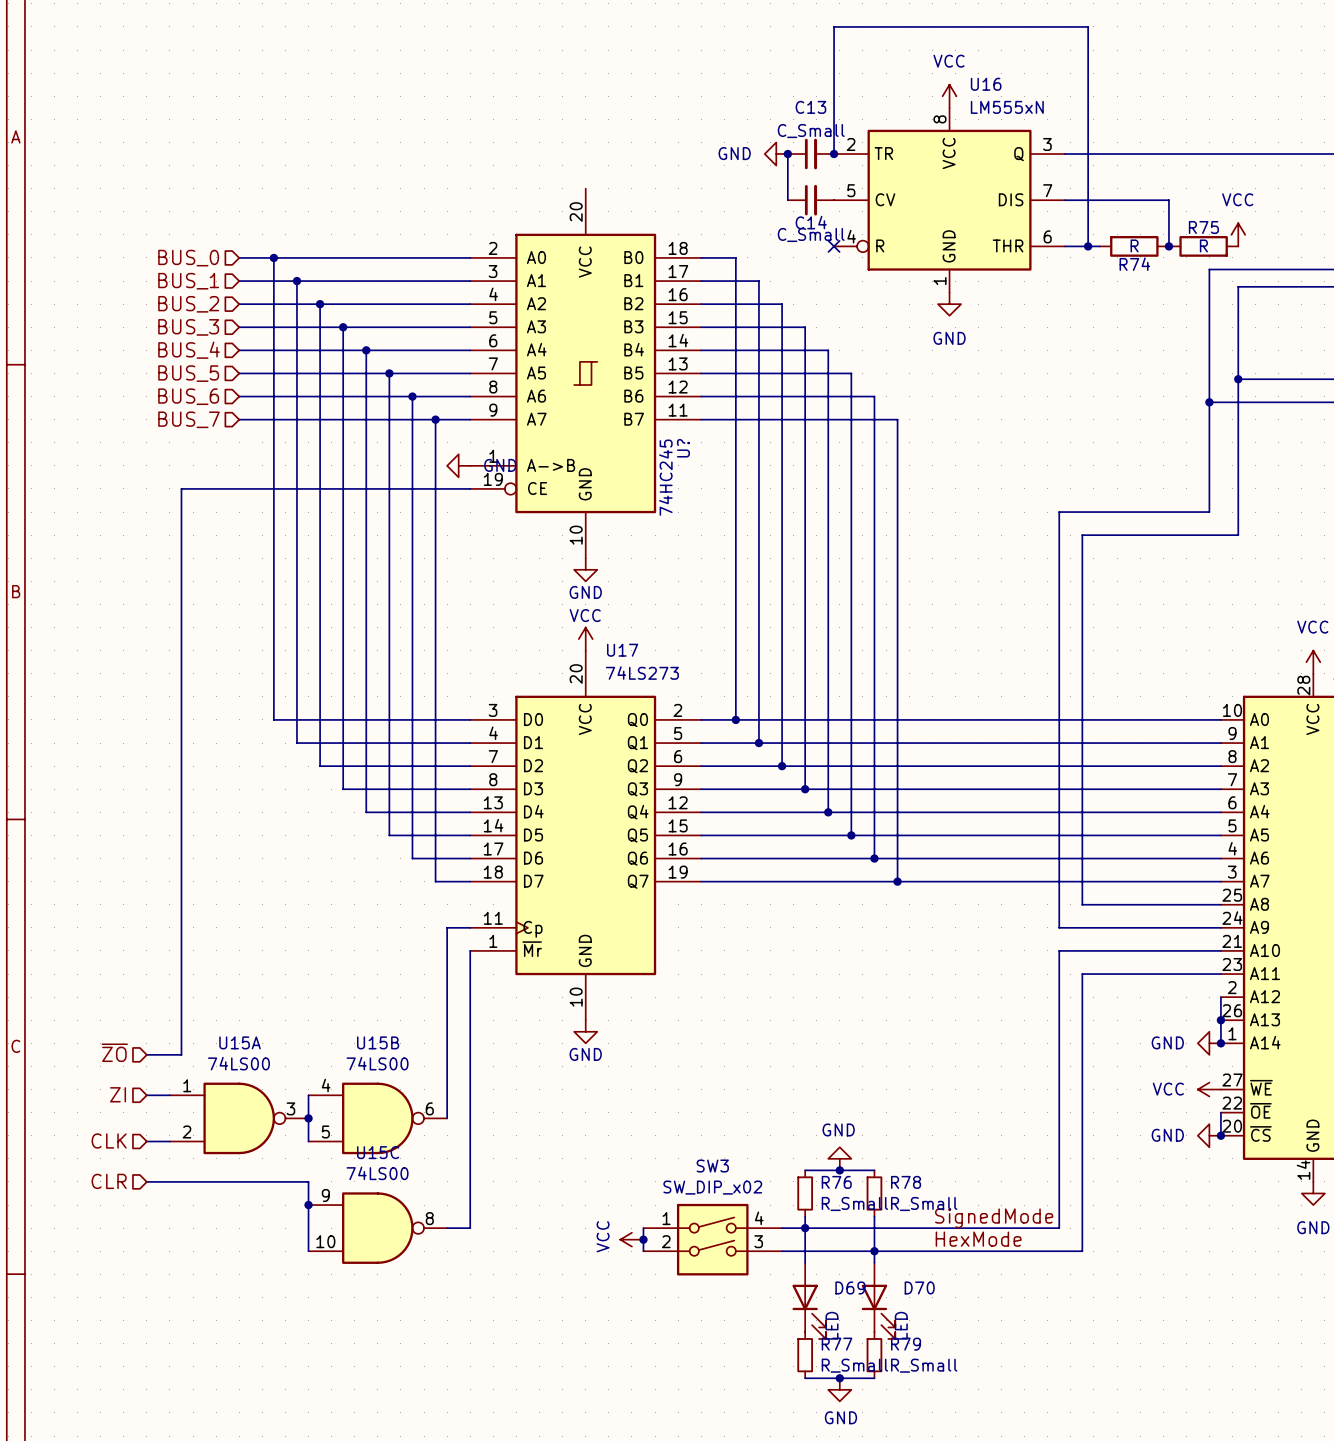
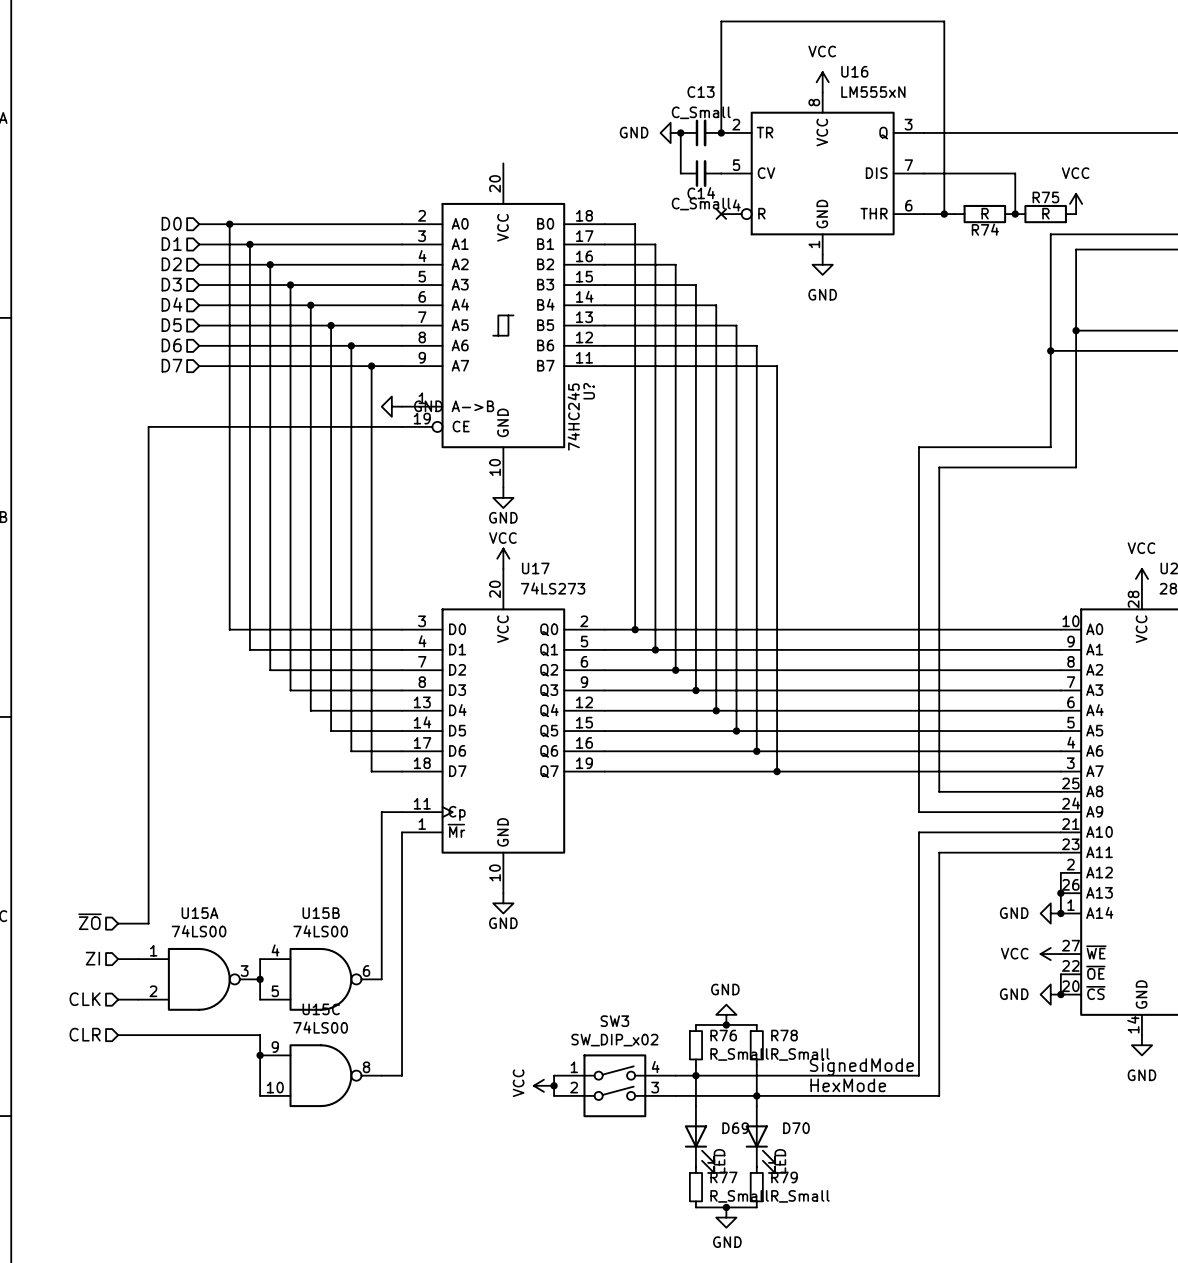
hierarchical label: BUS_0 (188, 258) -> D0 (171, 223)
hierarchical label: BUS_1 (188, 281) -> D1 (171, 244)
hierarchical label: BUS_2 (188, 304) -> D2 (171, 264)
hierarchical label: BUS_3 (188, 327) -> D3 (171, 284)
hierarchical label: BUS_4 (188, 350) -> D4 (171, 304)
hierarchical label: BUS_5 (188, 373) -> D5 (171, 325)
hierarchical label: BUS_6 (188, 396) -> D6 (171, 345)
hierarchical label: BUS_7 (188, 419) -> D7 (171, 365)

